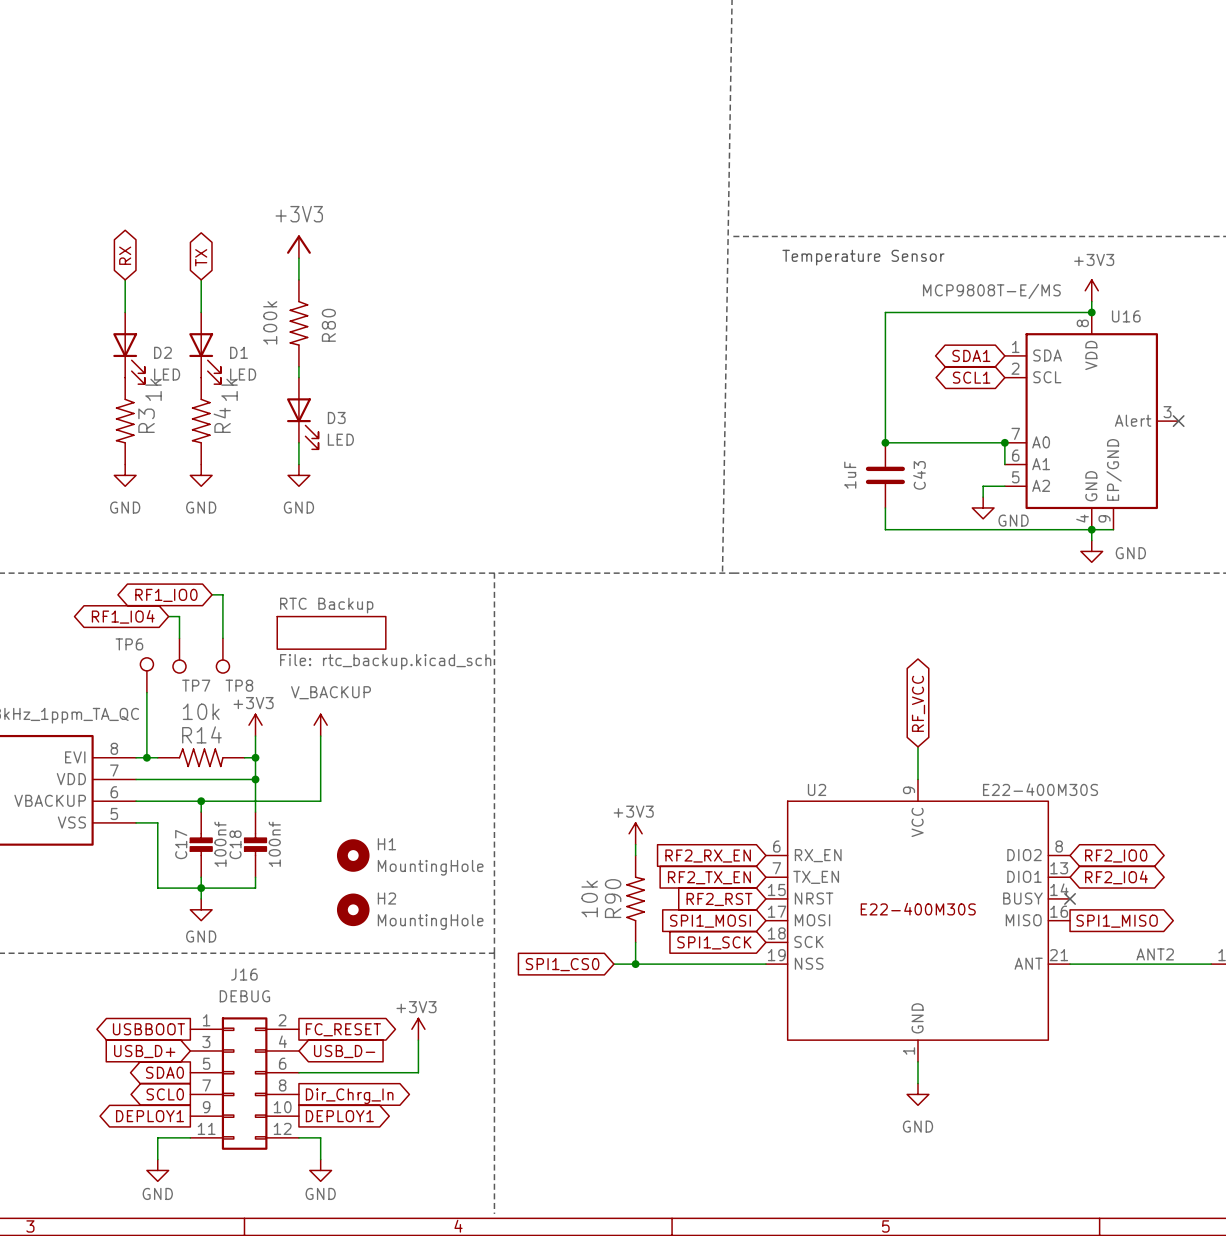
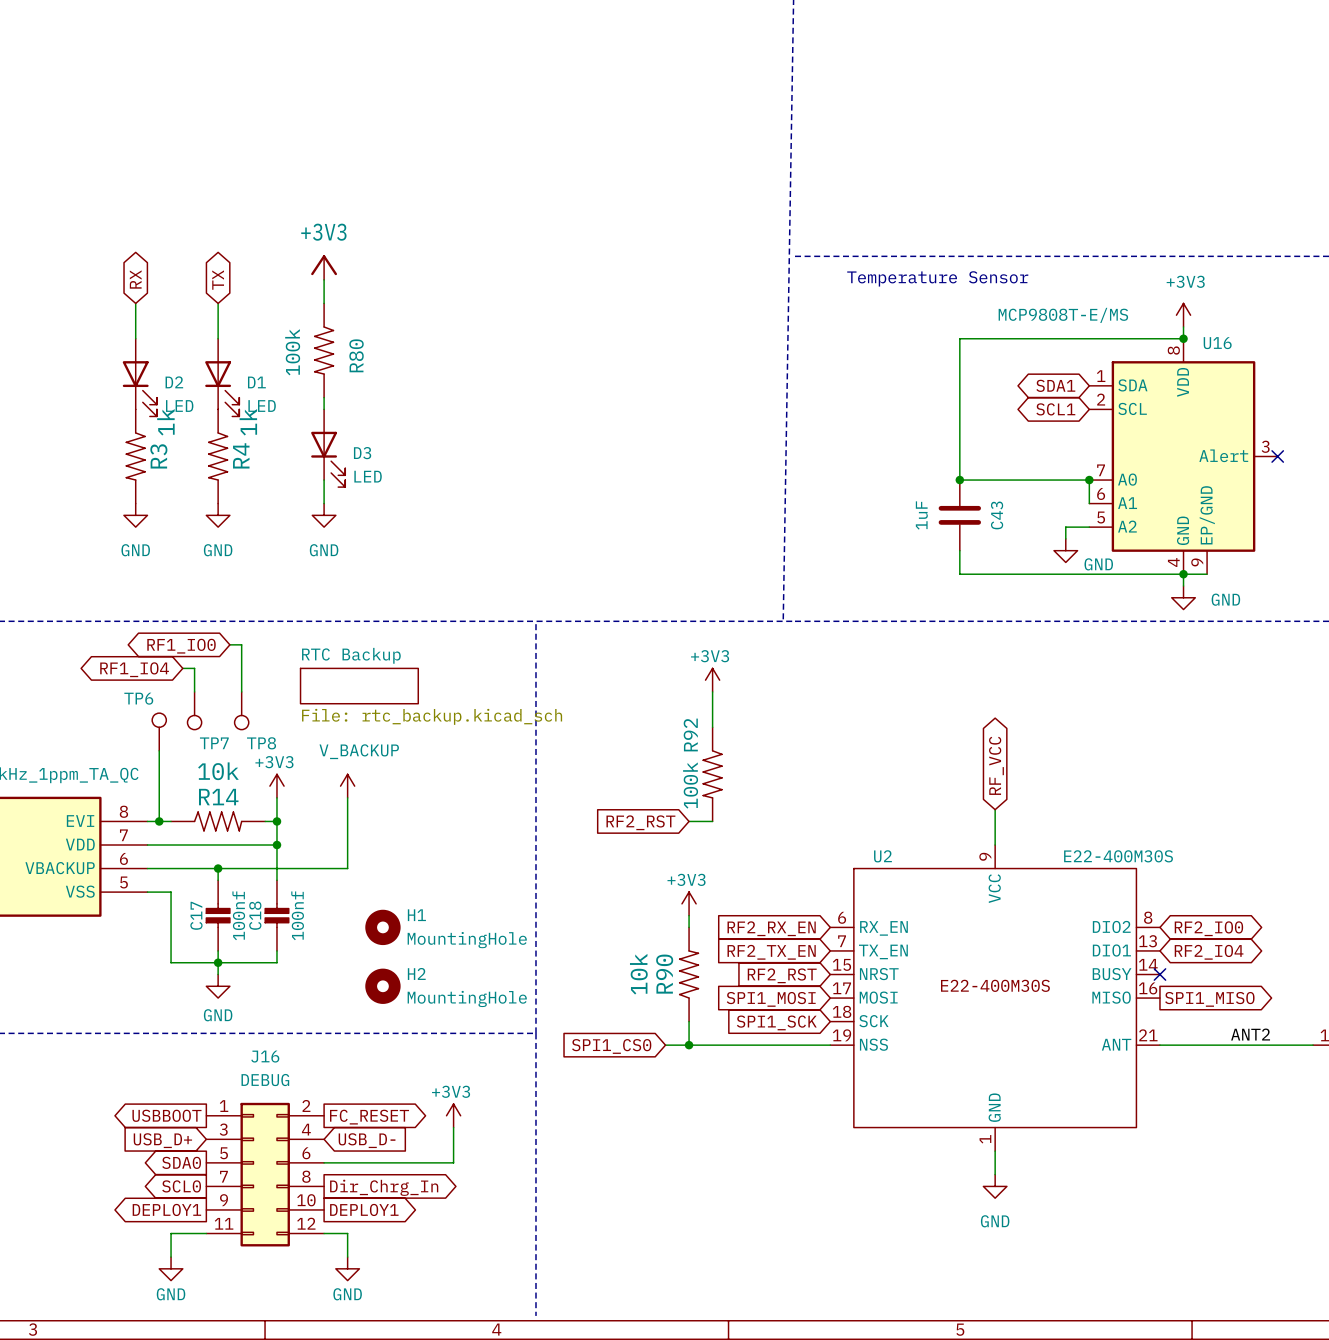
power symbol: none -> +3V3 (712, 680)
wire: none -> (712, 691) (712, 727)
R92: none -> 100k (712, 774)
wire: none -> (689, 821) (712, 821)
global label: none -> RF2_RST (640, 822)

